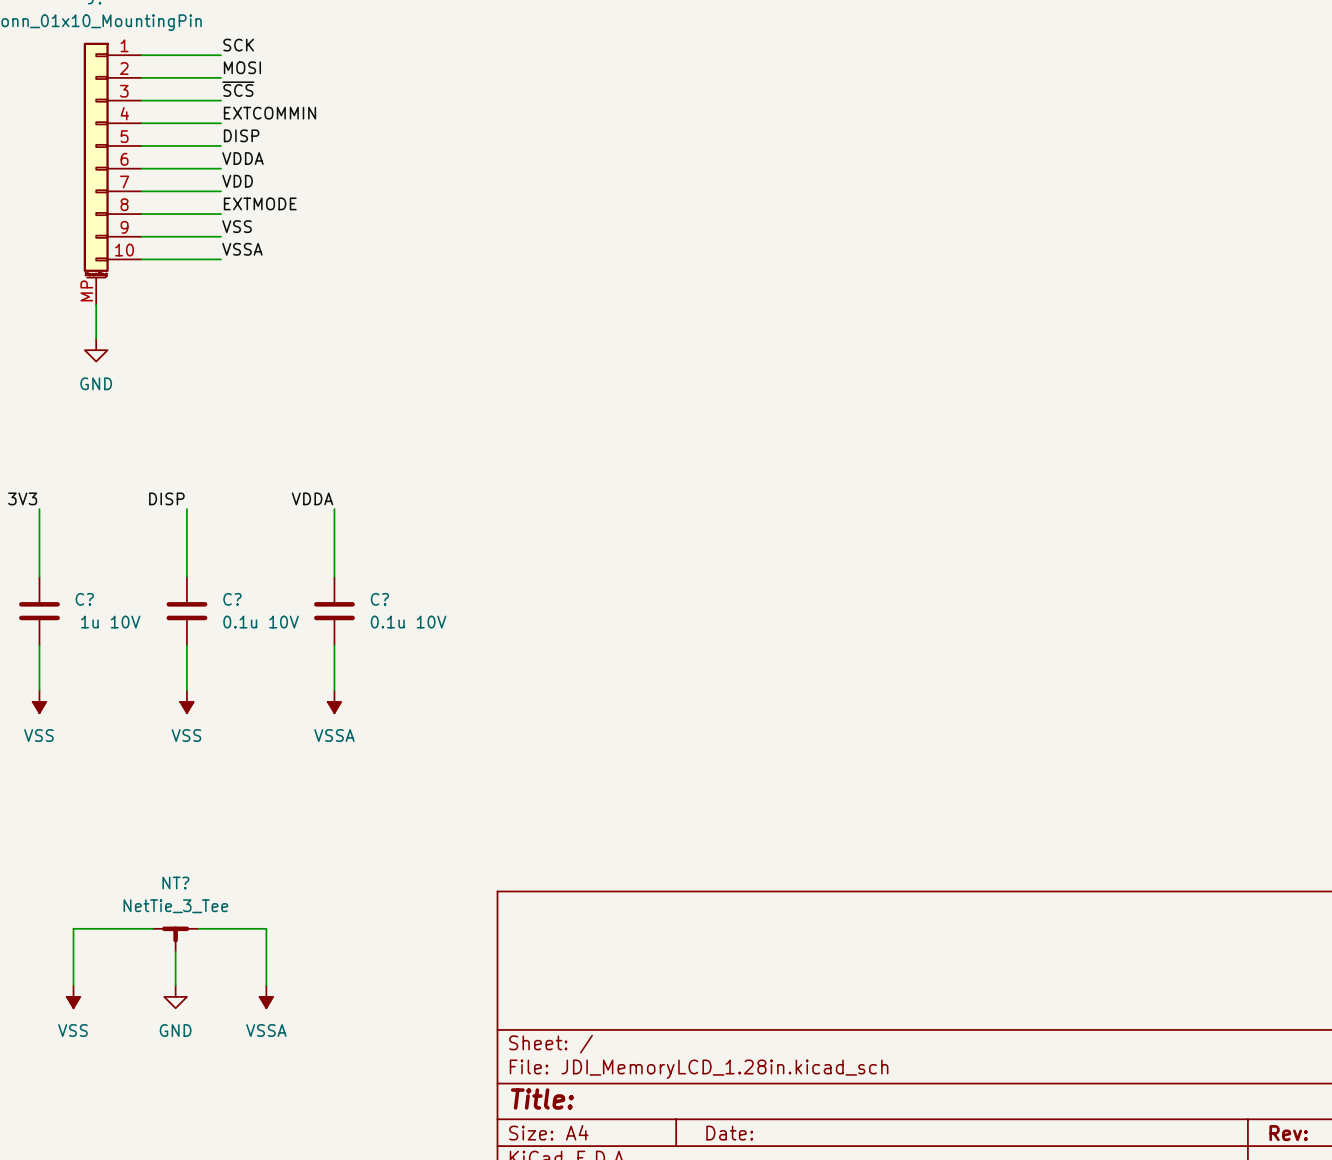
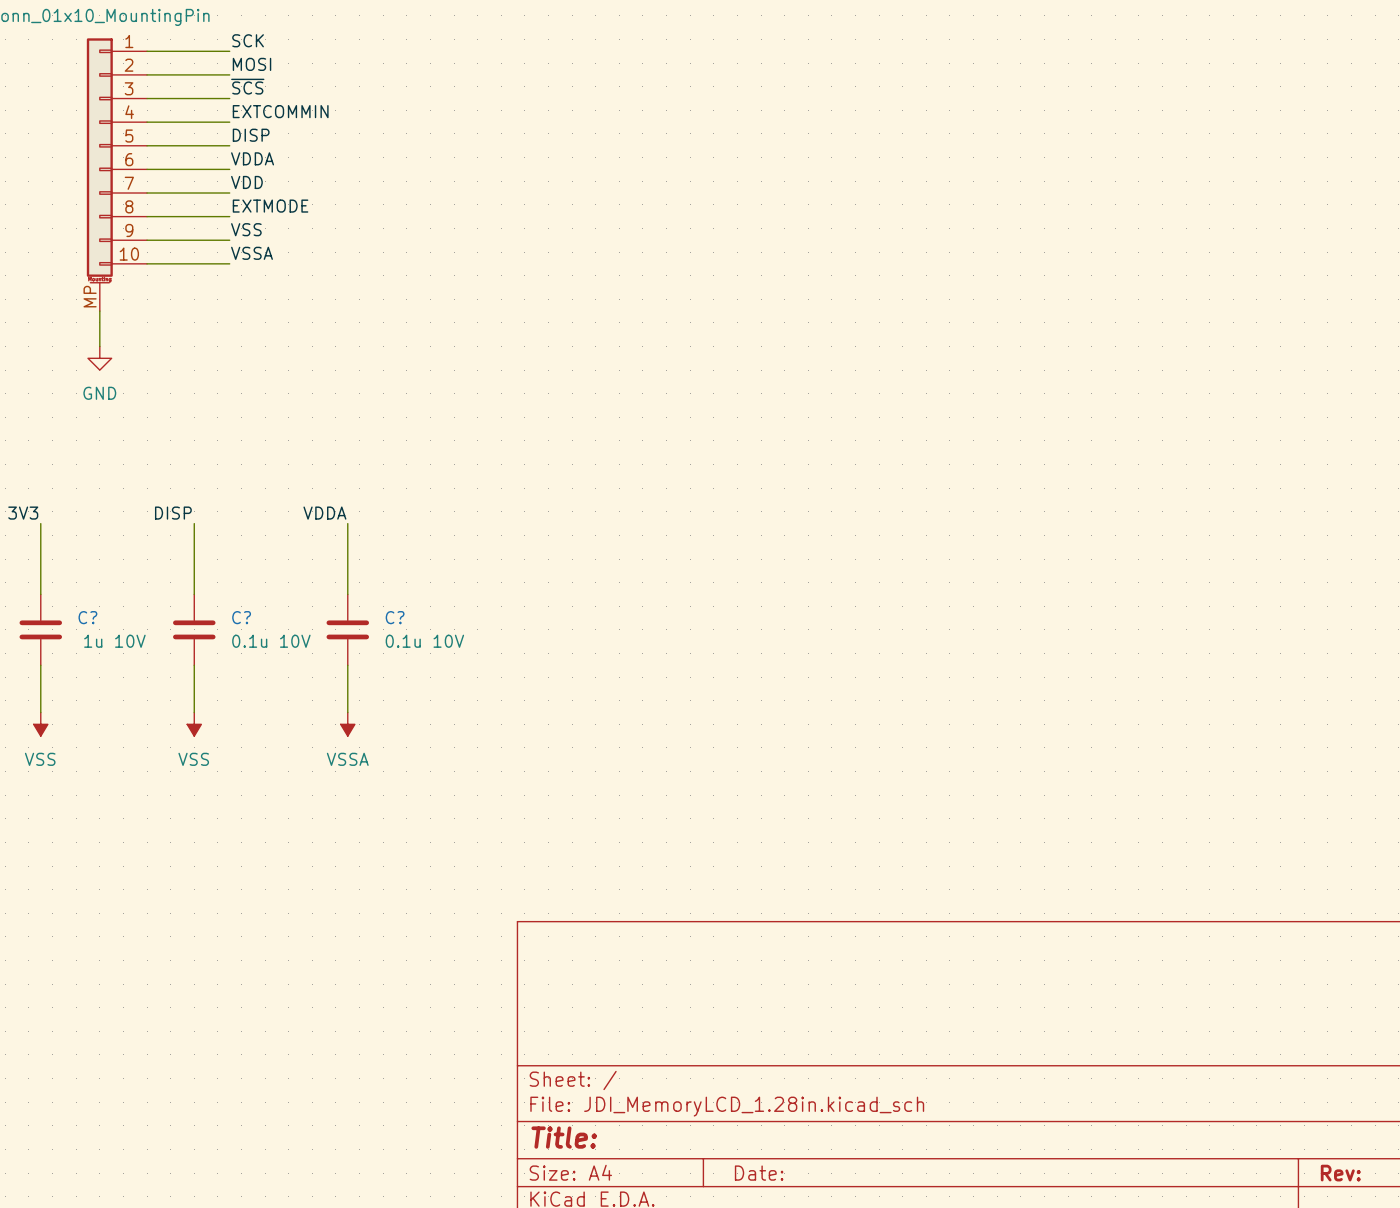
wire: (152, 928) (73, 928) (73, 985) -> none
wire: (198, 928) (266, 928) (266, 985) -> none
NT?: NetTie_3_Tee (175, 939) -> none
wire: (175, 951) (175, 985) -> none
power symbol: VSS (73, 996) -> none
power symbol: GND (175, 996) -> none
power symbol: VSSA (266, 996) -> none

